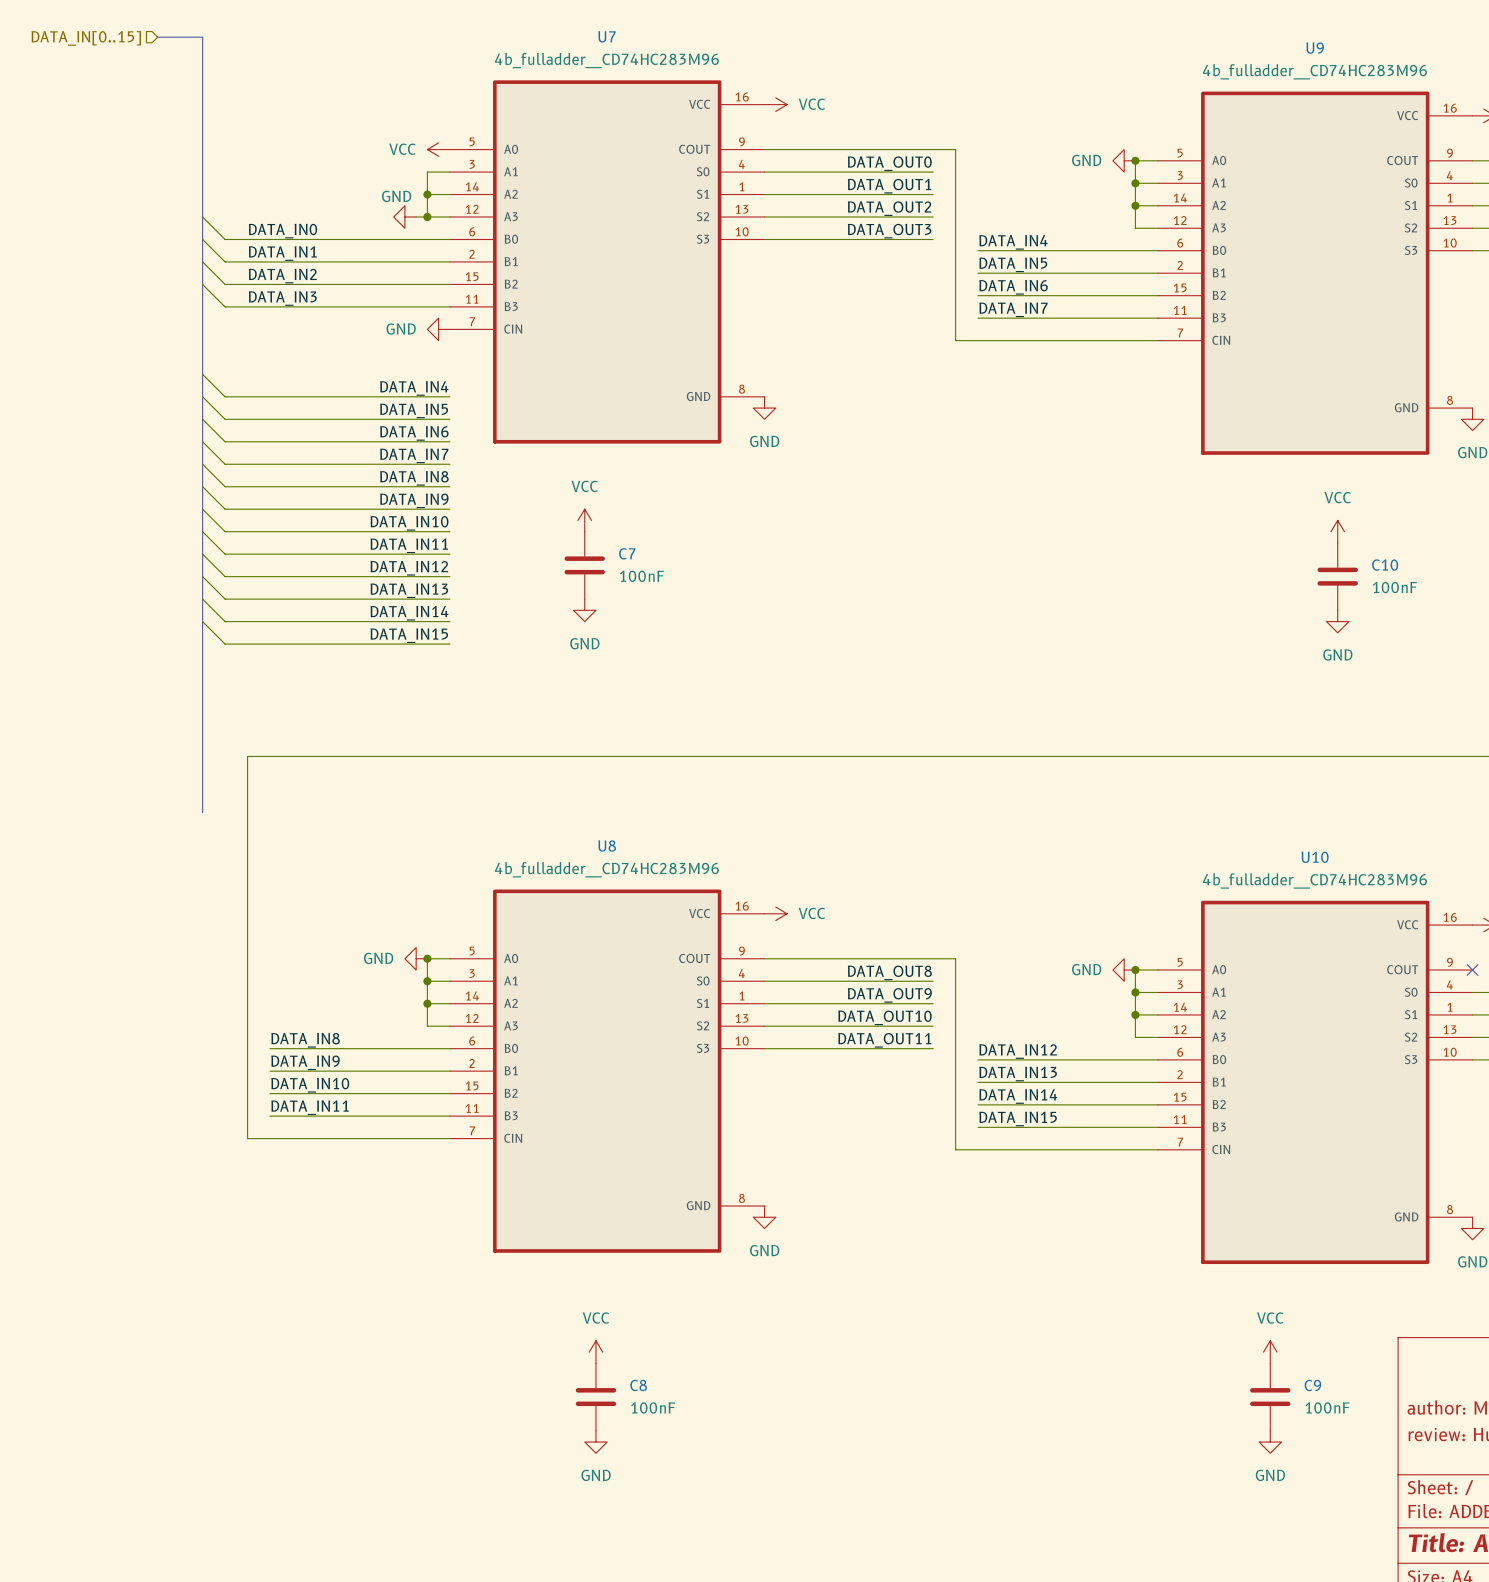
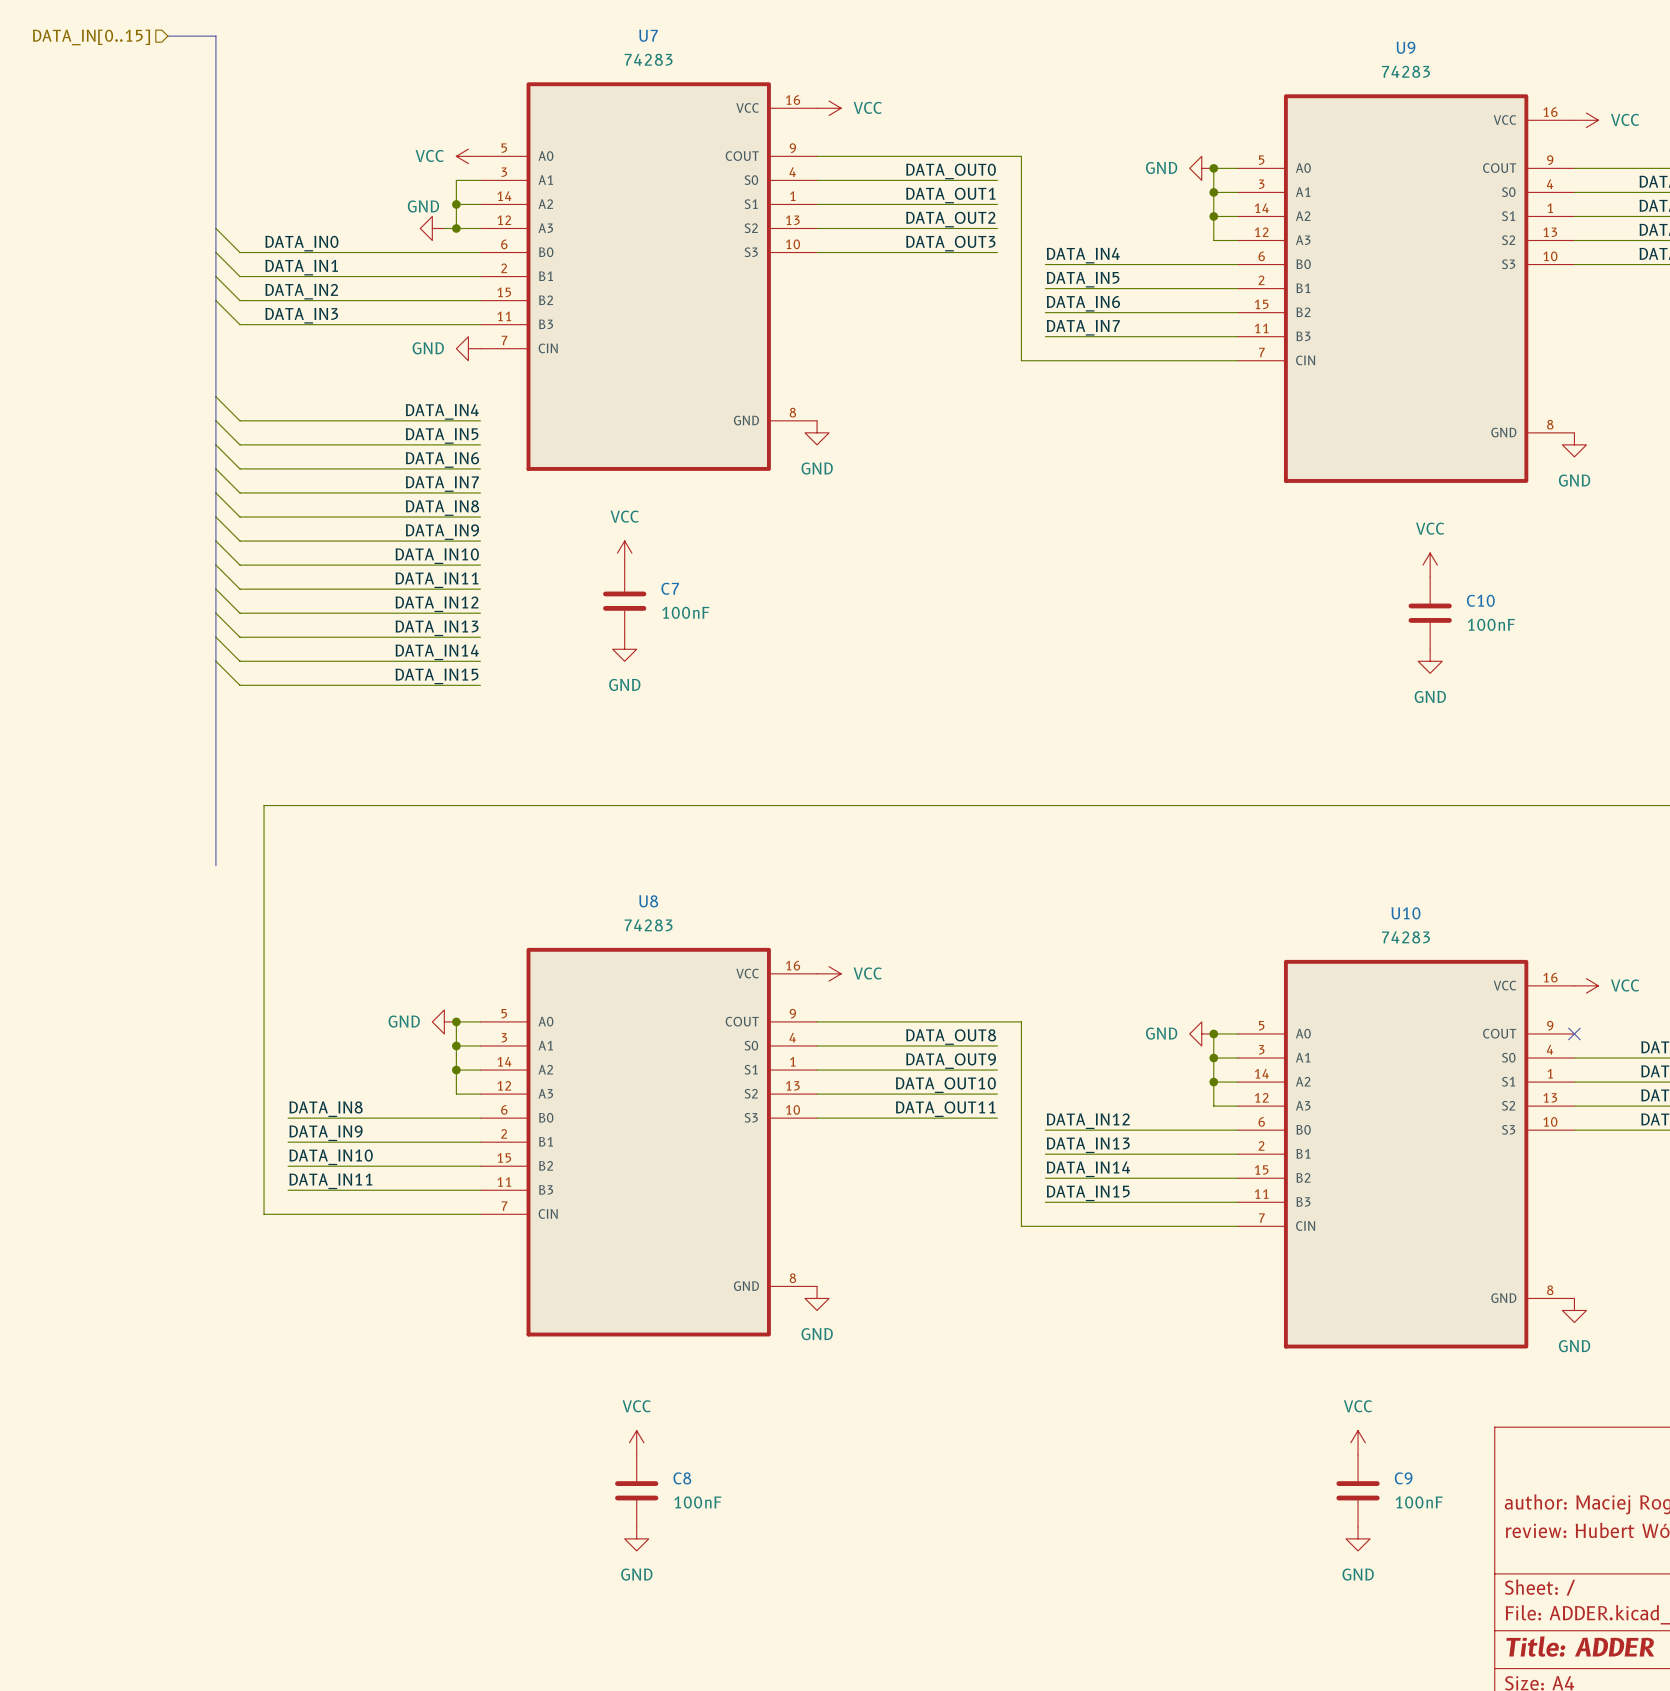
U7 value: 4b_fulladder__CD74HC283M96 (606, 60) -> 74283 (648, 59)
U9 value: 4b_fulladder__CD74HC283M96 (1314, 71) -> 74283 (1405, 71)
U8 value: 4b_fulladder__CD74HC283M96 (606, 869) -> 74283 (648, 925)
U10 value: 4b_fulladder__CD74HC283M96 (1314, 880) -> 74283 (1405, 937)

